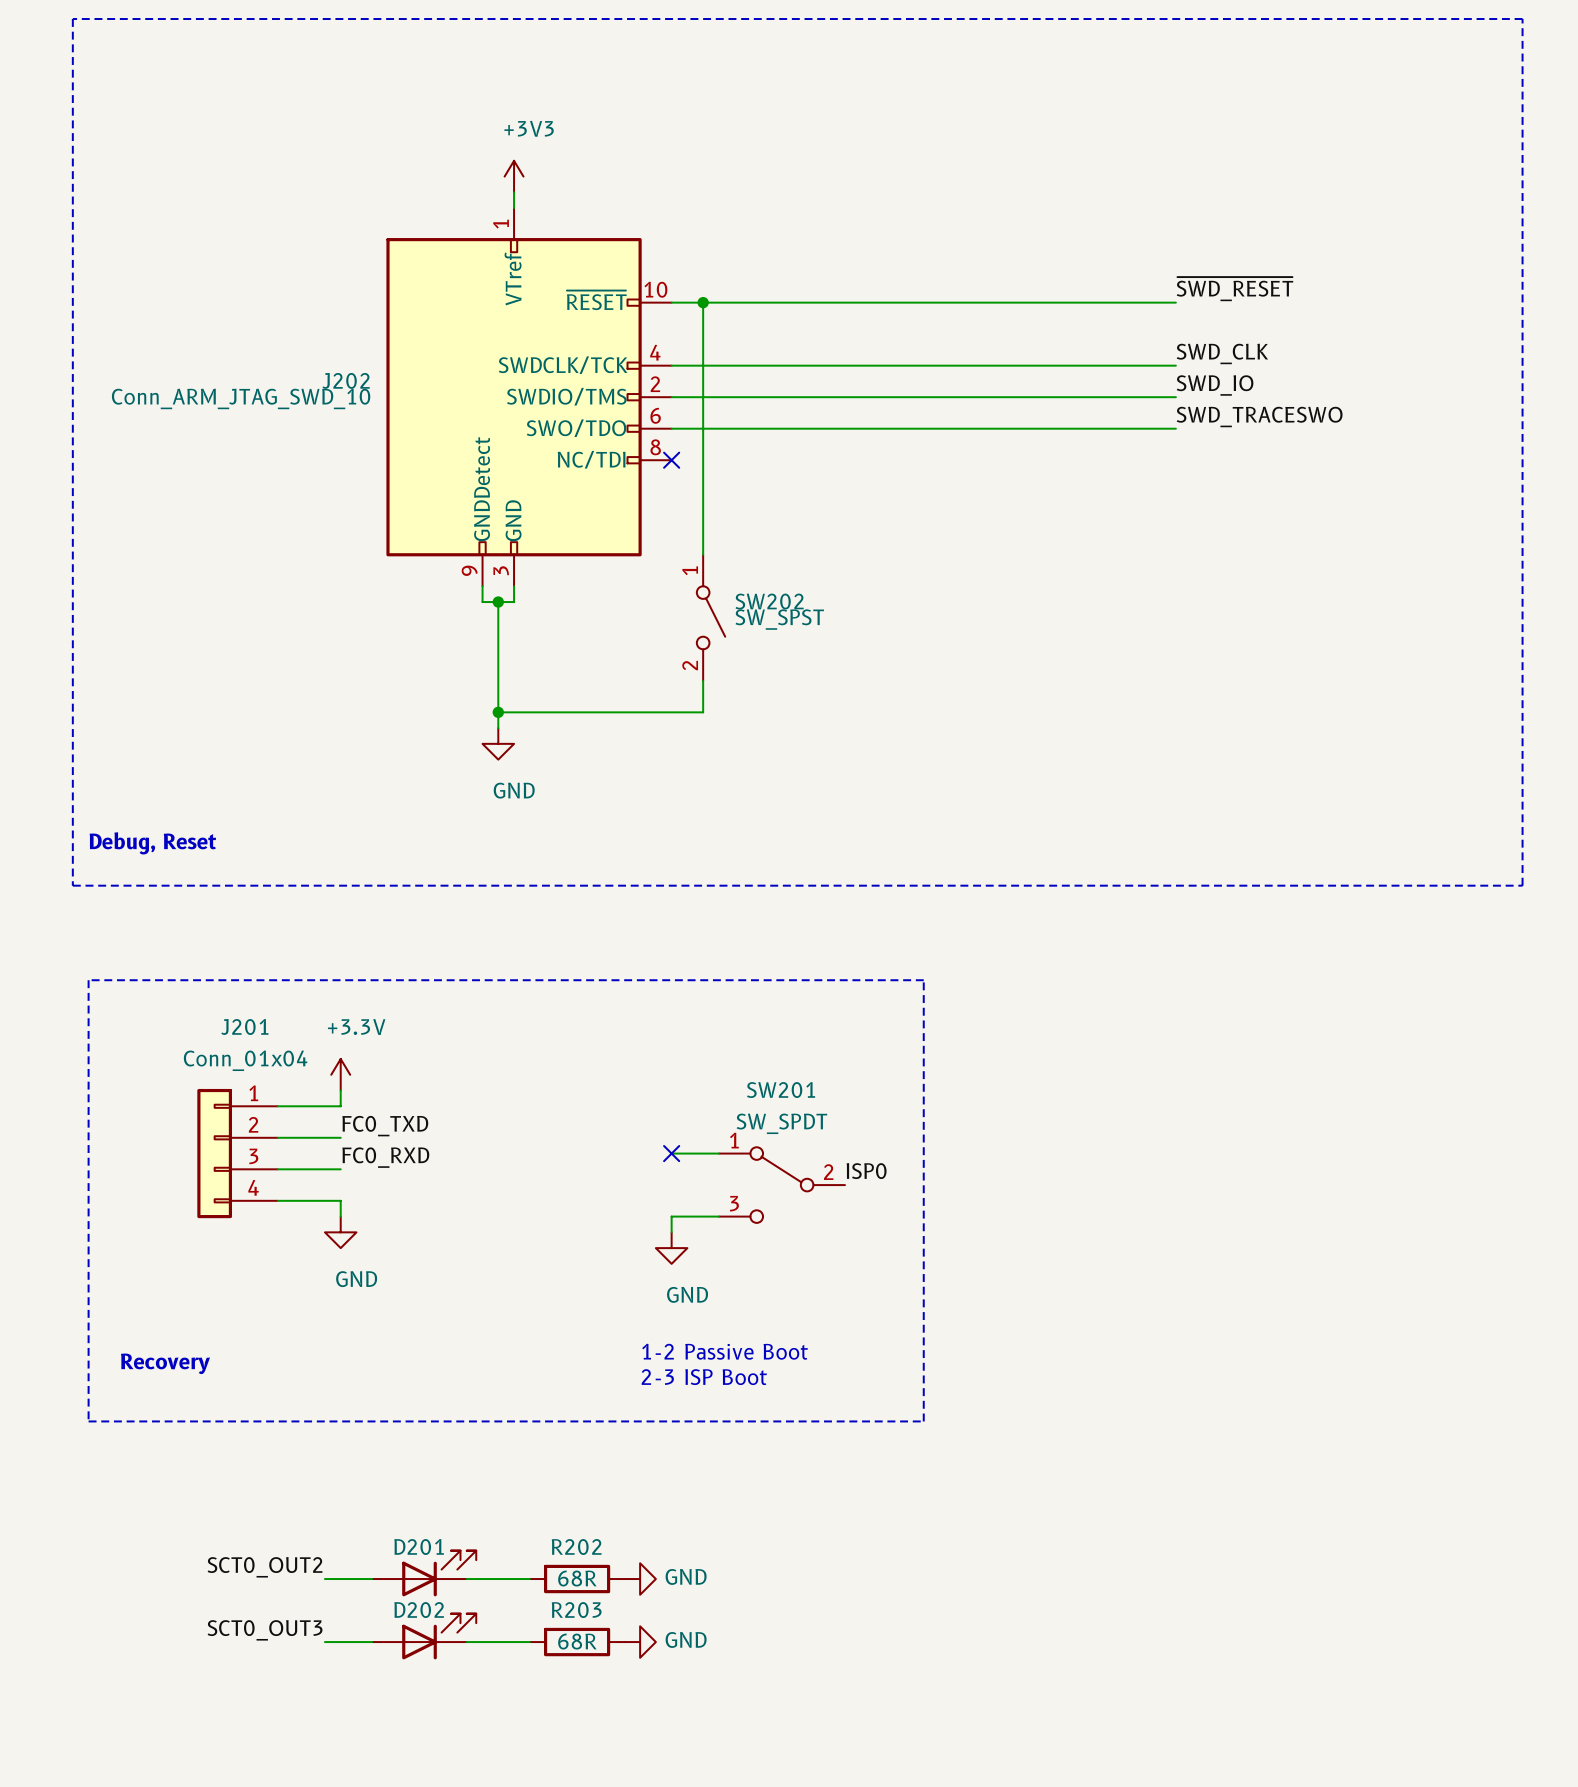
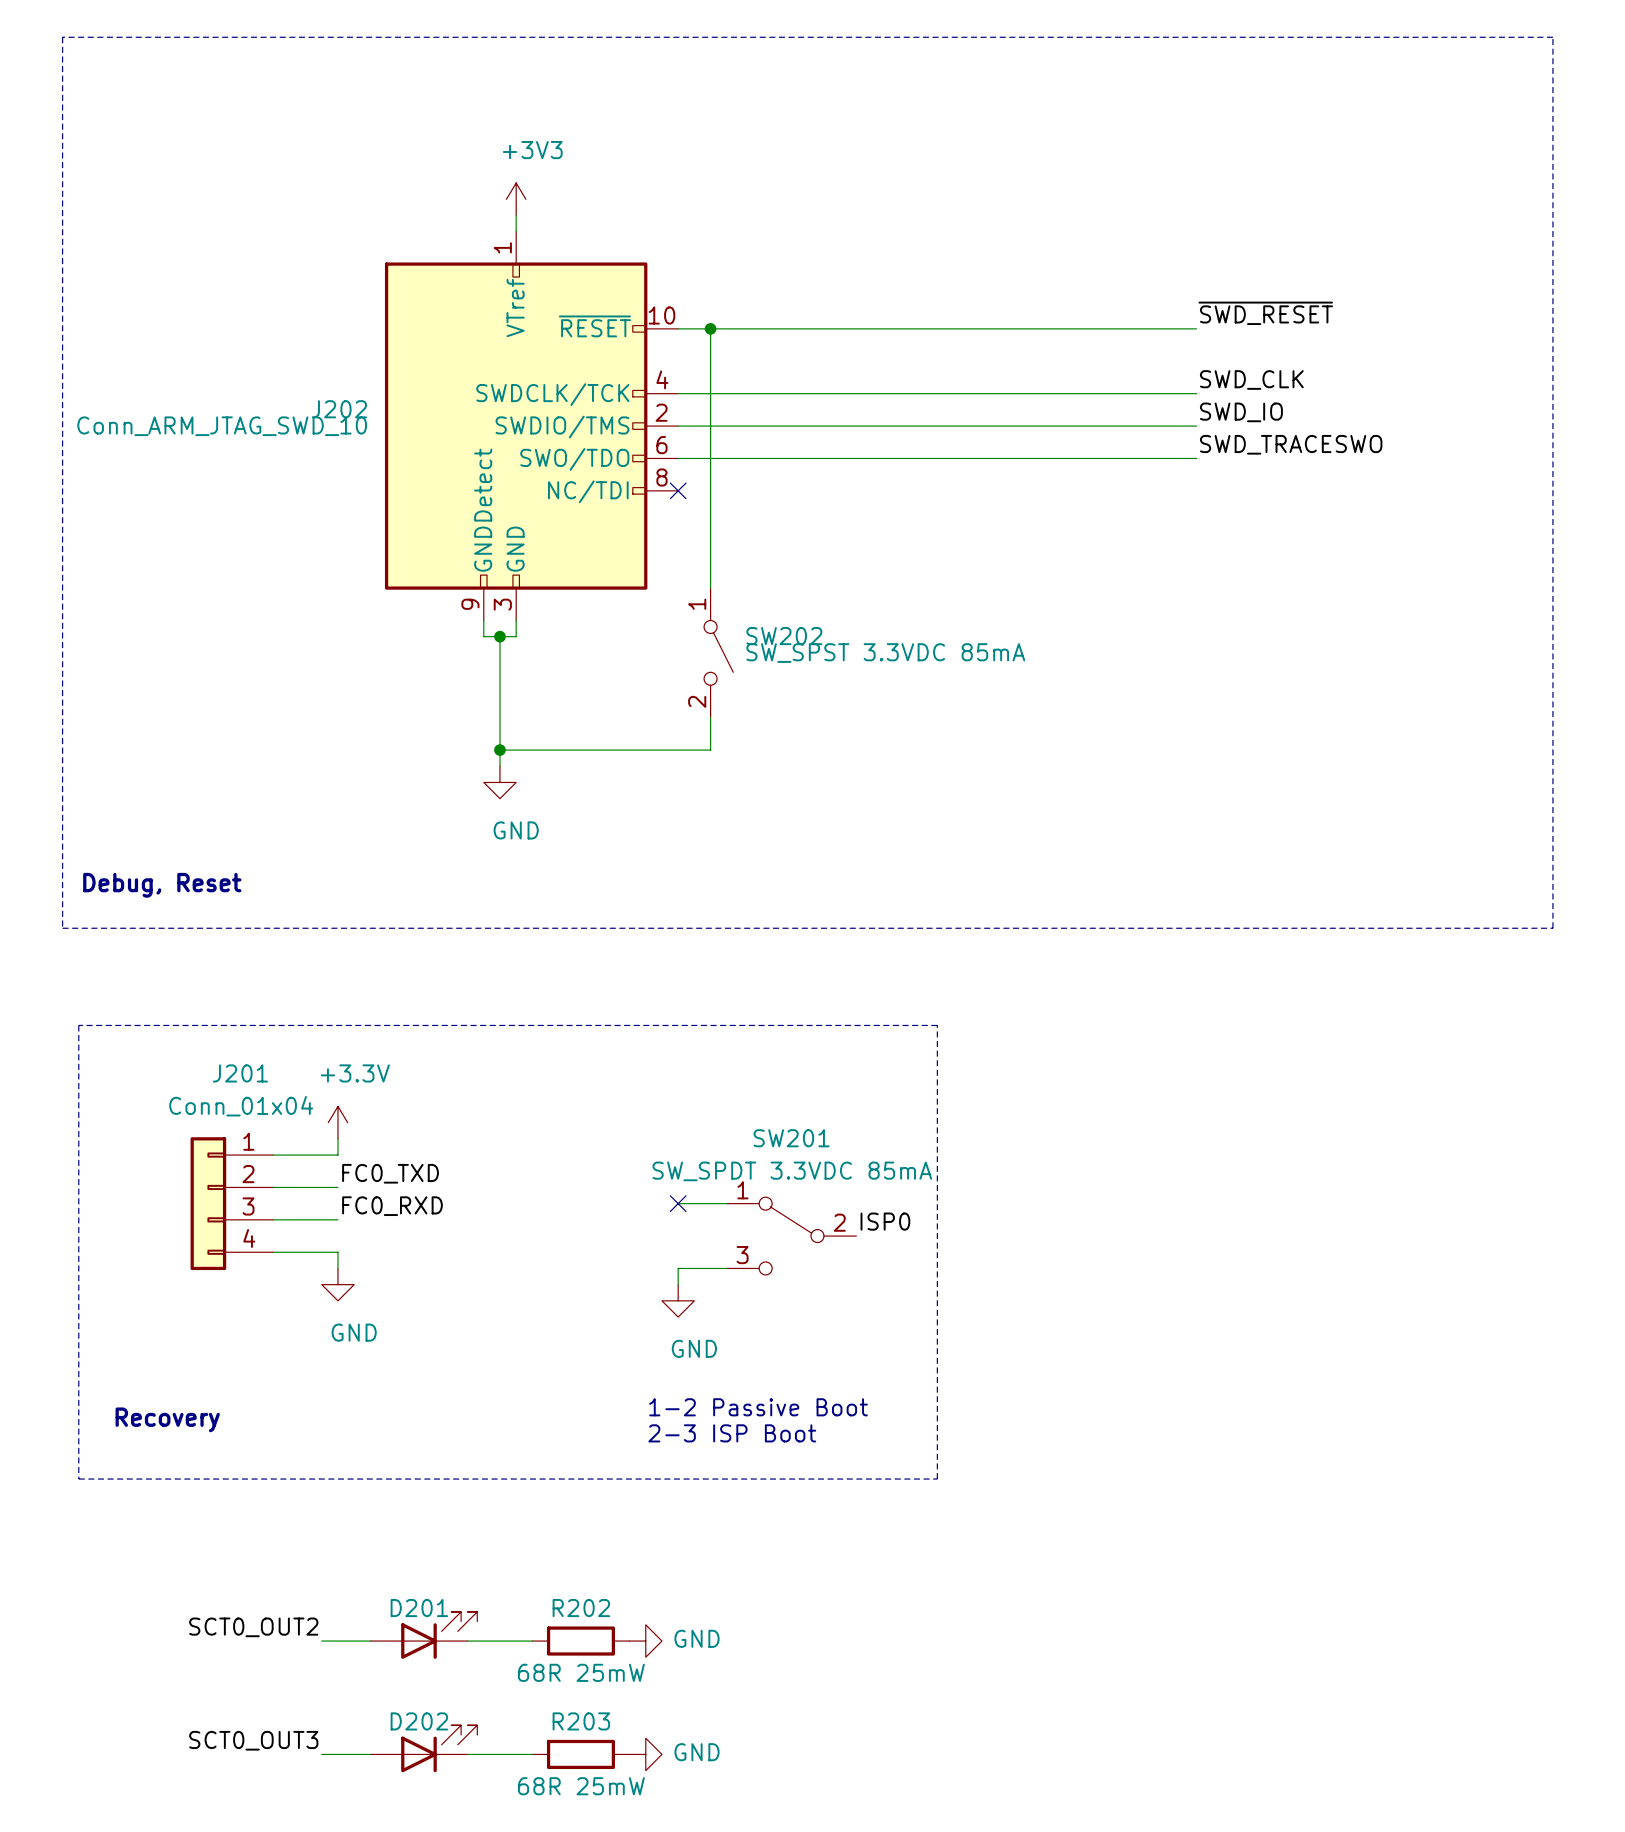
SW202 value: SW_SPST (779, 619) -> SW_SPST 3.3VDC 85mA (885, 653)
SW201 value: SW_SPDT (781, 1123) -> SW_SPDT 3.3VDC 85mA (792, 1171)
R202 value: 68R (577, 1578) -> 68R 25mW (581, 1672)
label position: SCT0_OUT3 (265, 1630) -> SCT0_OUT3 (253, 1740)
D202 position: (424, 1636) -> (423, 1748)
R203 value: 68R (577, 1641) -> 68R 25mW (581, 1786)
wire: (324, 1642) (372, 1642) -> (321, 1754) (370, 1754)
wire: (466, 1642) (529, 1642) -> (467, 1754) (532, 1754)
R203 position: (577, 1642) -> (580, 1754)
power symbol position: GND (640, 1642) -> GND (645, 1754)

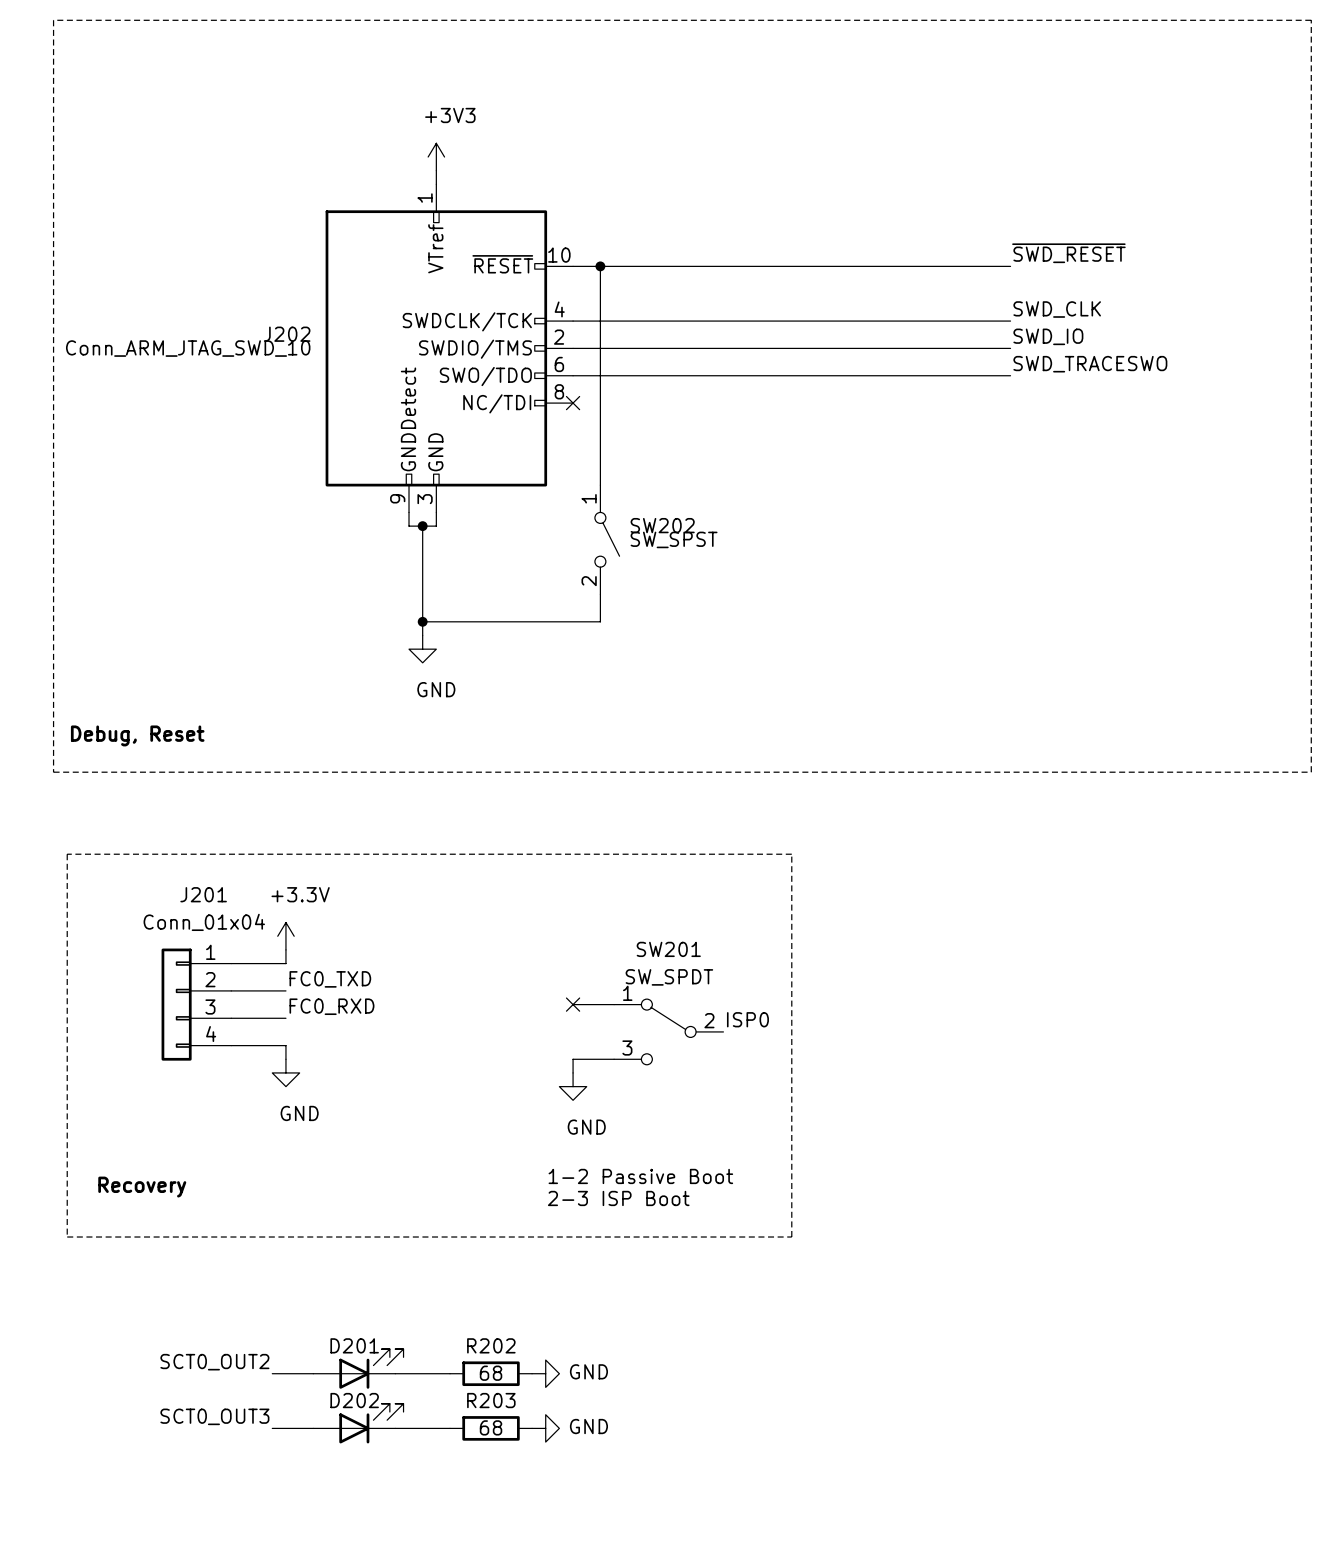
SW202 value: SW_SPST 3.3VDC 85mA (885, 653) -> SW_SPST (674, 539)
SW201 value: SW_SPDT 3.3VDC 85mA (792, 1171) -> SW_SPDT (669, 977)
R202 value: 68R 25mW (581, 1672) -> 68 (491, 1373)
label position: SCT0_OUT3 (253, 1740) -> SCT0_OUT3 (214, 1416)
D202 position: (423, 1748) -> (358, 1423)
wire: (321, 1754) (370, 1754) -> (272, 1428) (313, 1428)
wire: (467, 1754) (532, 1754) -> (395, 1428) (450, 1428)
R203 position: (580, 1754) -> (491, 1428)
power symbol position: GND (645, 1754) -> GND (545, 1428)
R203 value: 68R 25mW (581, 1786) -> 68 (491, 1427)

